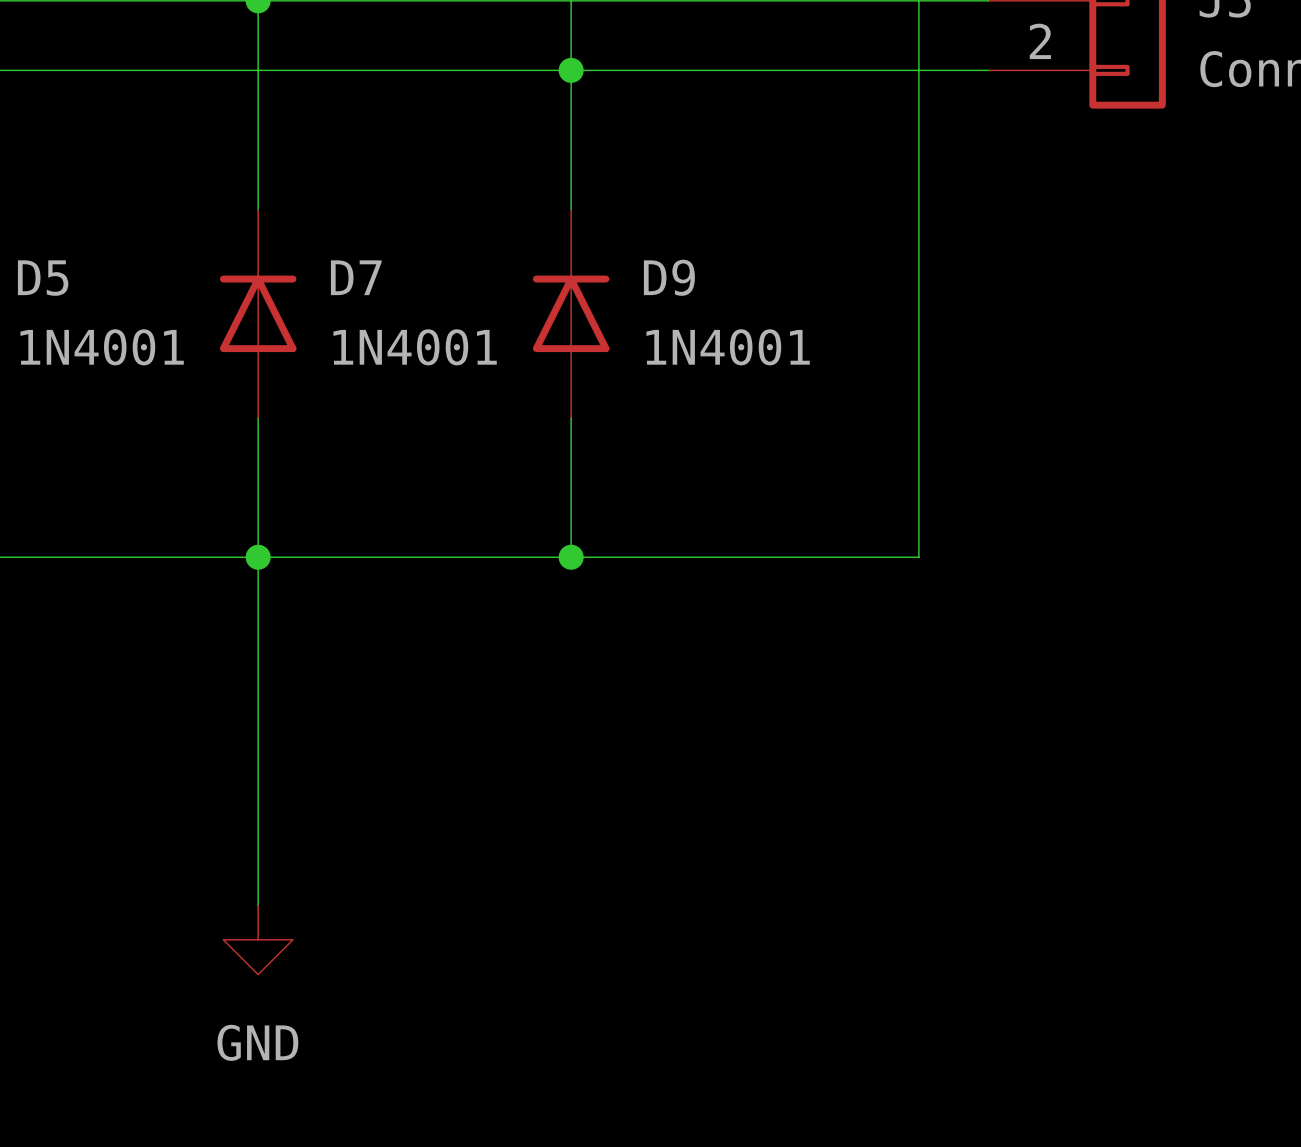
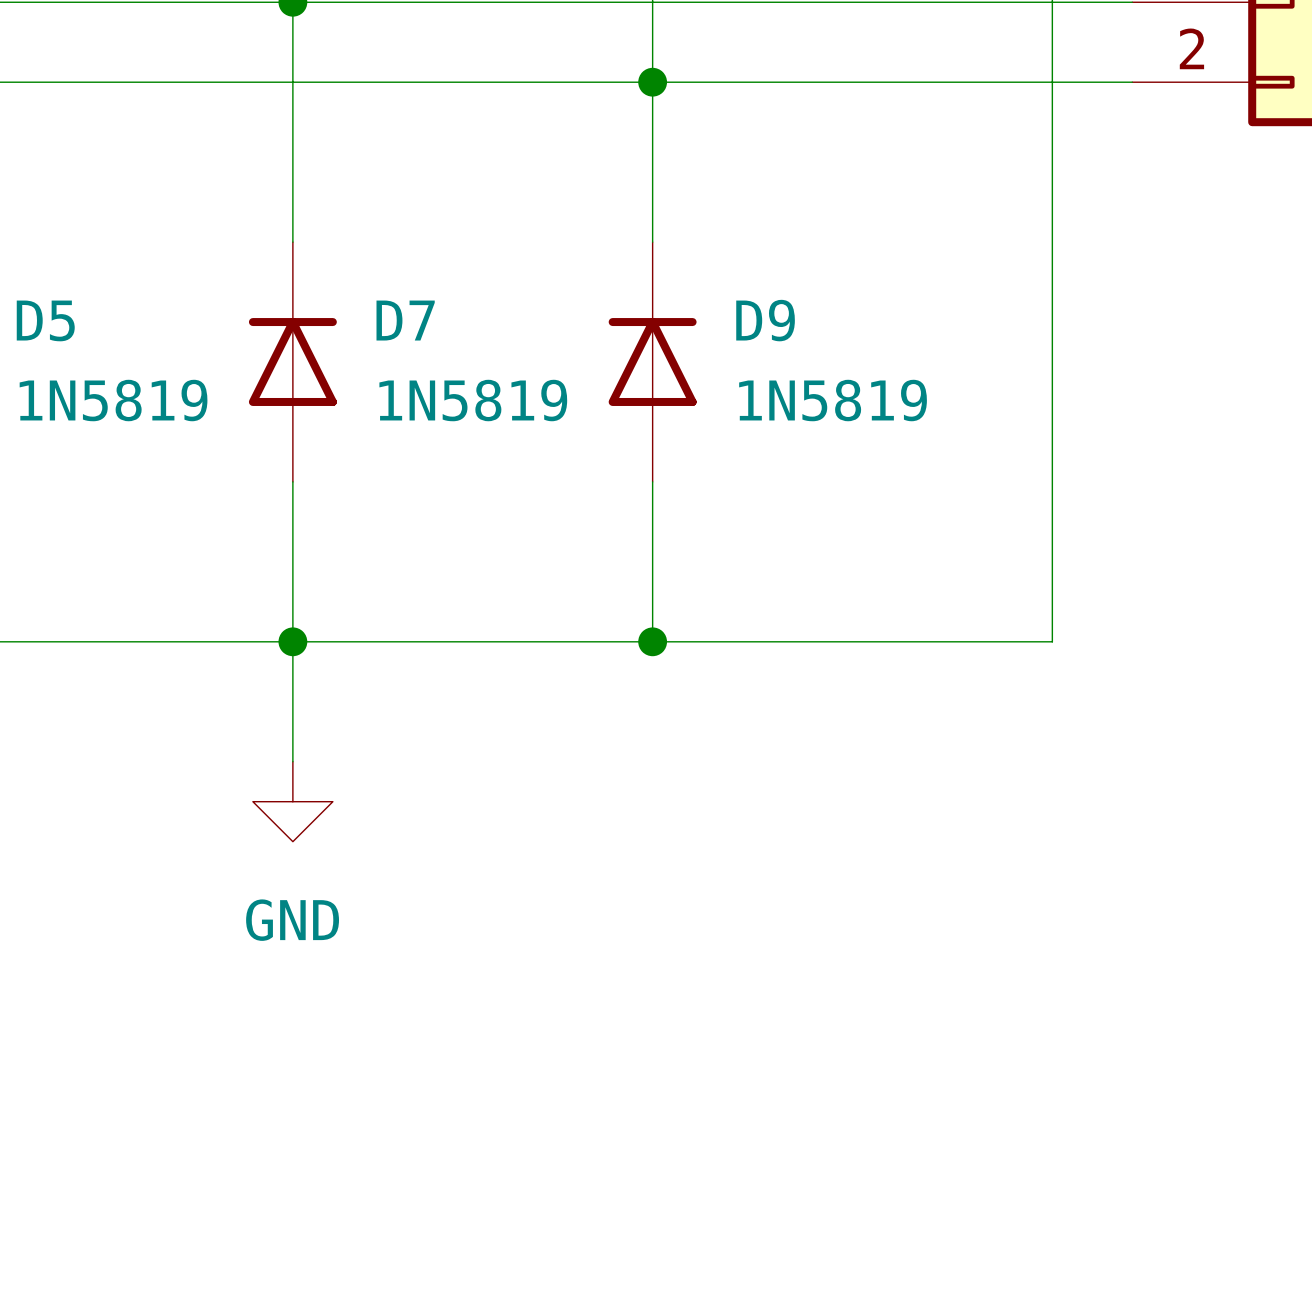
D5 value: 1N4001 (102, 347) -> 1N5819 (113, 400)
D7 value: 1N4001 (415, 347) -> 1N5819 (473, 400)
D9 value: 1N4001 (728, 347) -> 1N5819 (833, 400)
wire: (258, 661) (258, 905) -> none
power symbol position: GND (258, 939) -> GND (292, 801)

